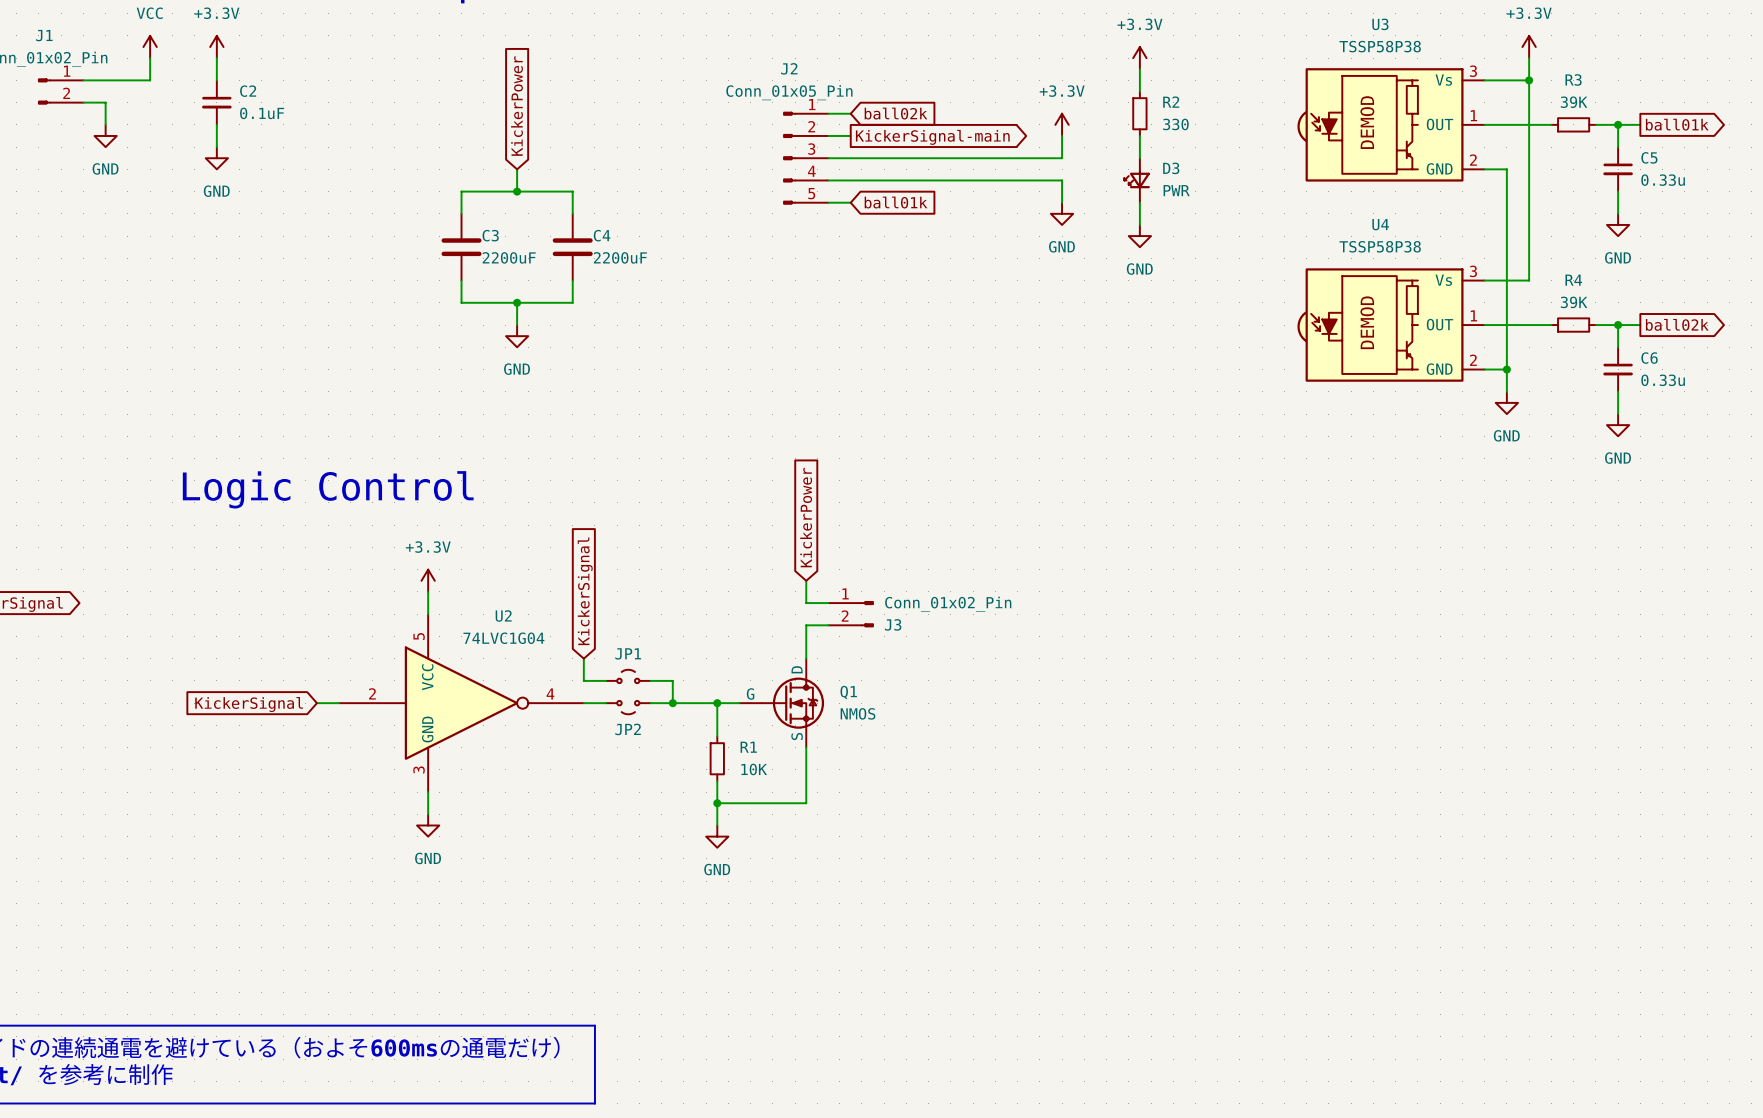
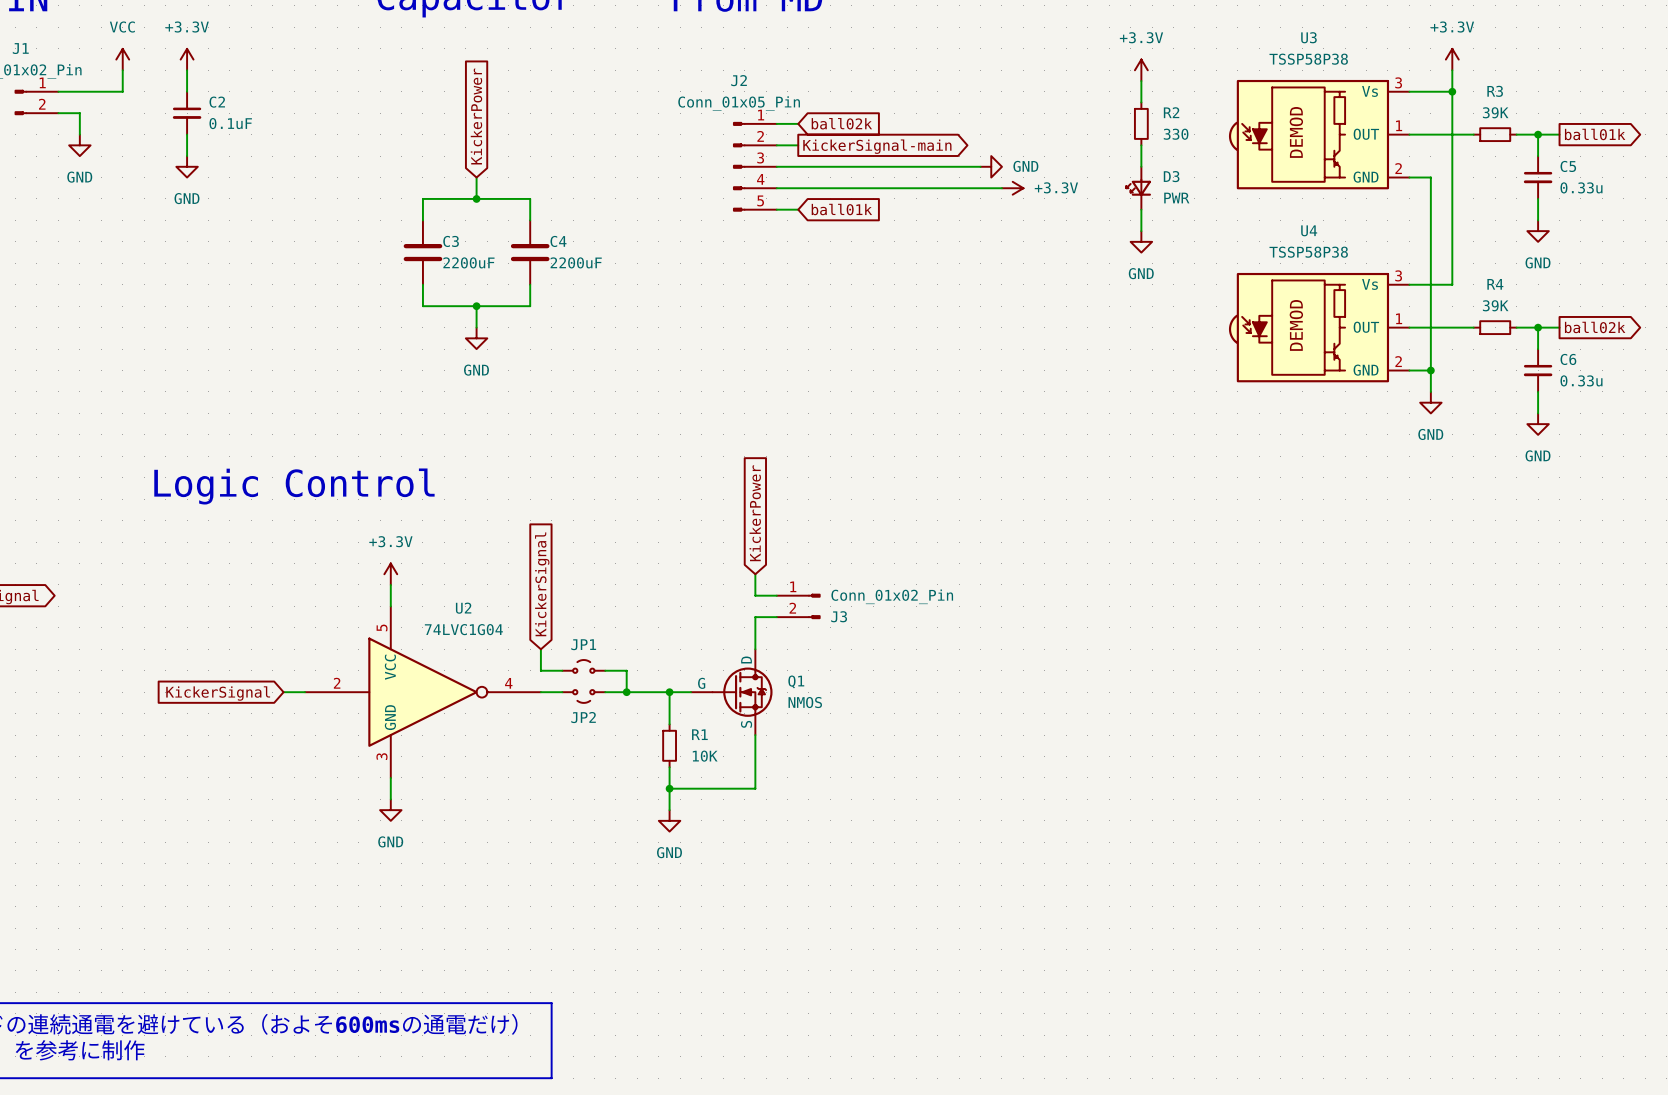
power symbol position: +3.3V (1139, 58) -> +3.3V (1141, 70)
wire: (1139, 69) (1139, 91) -> (1141, 81) (1141, 102)
power symbol text position: +3.3V (1062, 91) -> +3.3V (1056, 187)
R2 position: (1139, 113) -> (1141, 123)
power symbol rotation: 0° (1062, 124) -> 90° clockwise (1012, 188)
power symbol position: +3.3V (1062, 124) -> +3.3V (1012, 188)
wire: (1062, 135) (1062, 158) (1039, 158) -> none
wire: (1139, 135) (1139, 158) -> (1141, 145) (1141, 166)
wire: (1062, 180) (1062, 202) -> none
D3 position: (1137, 180) -> (1138, 188)
wire: (1139, 202) (1139, 224) -> (1141, 209) (1141, 231)
power symbol rotation: 0° (1062, 213) -> 90° counterclockwise (991, 166)
power symbol position: GND (1062, 213) -> GND (991, 166)
power symbol: GND (1139, 236) -> none
power symbol: none -> GND (1141, 241)

